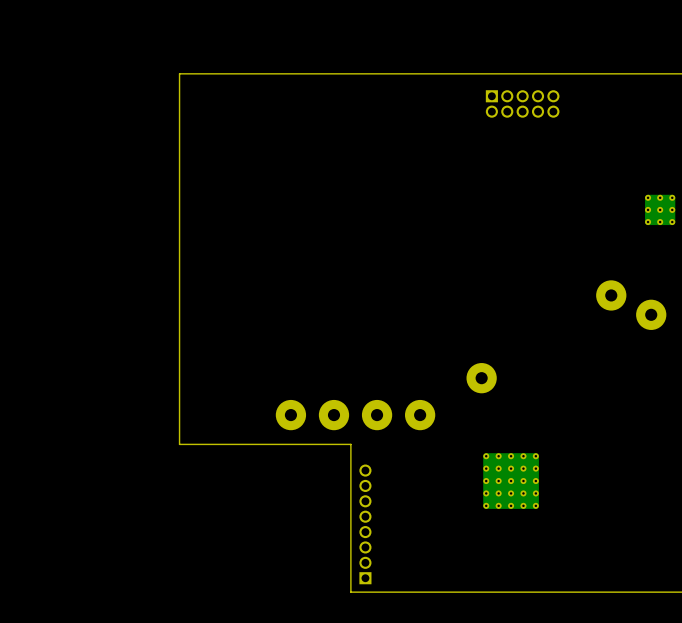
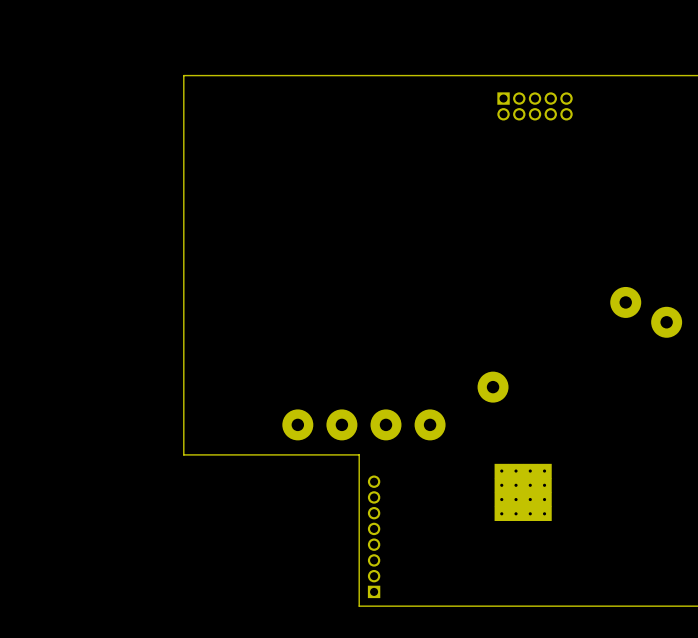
part: (660, 209) -> none
part footprint: [483, 453, 539, 509] -> [494, 463, 552, 521]

